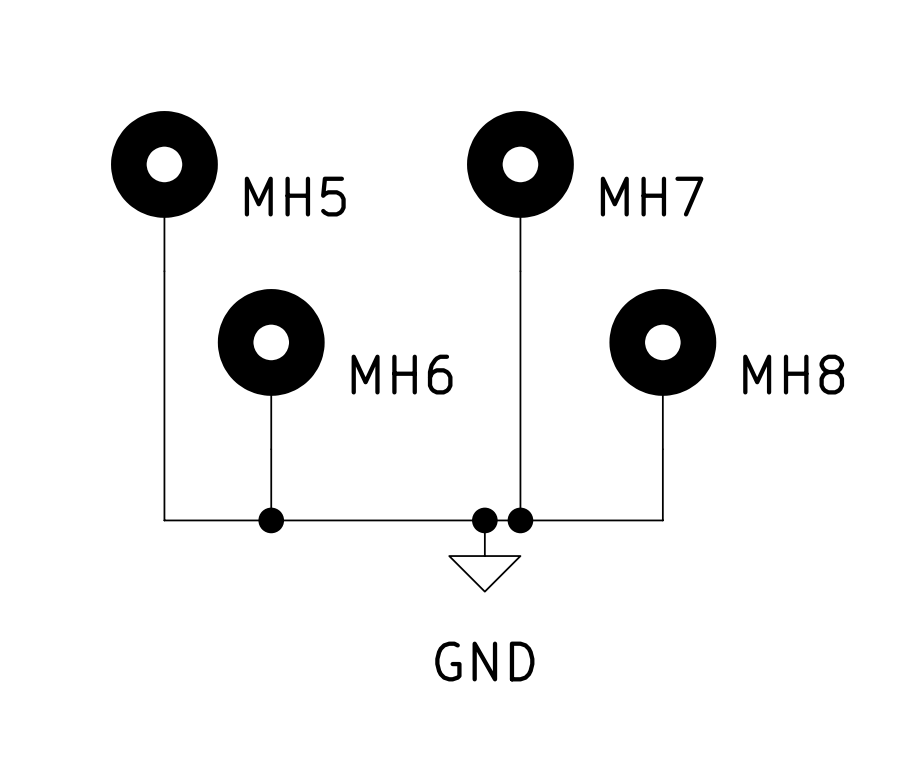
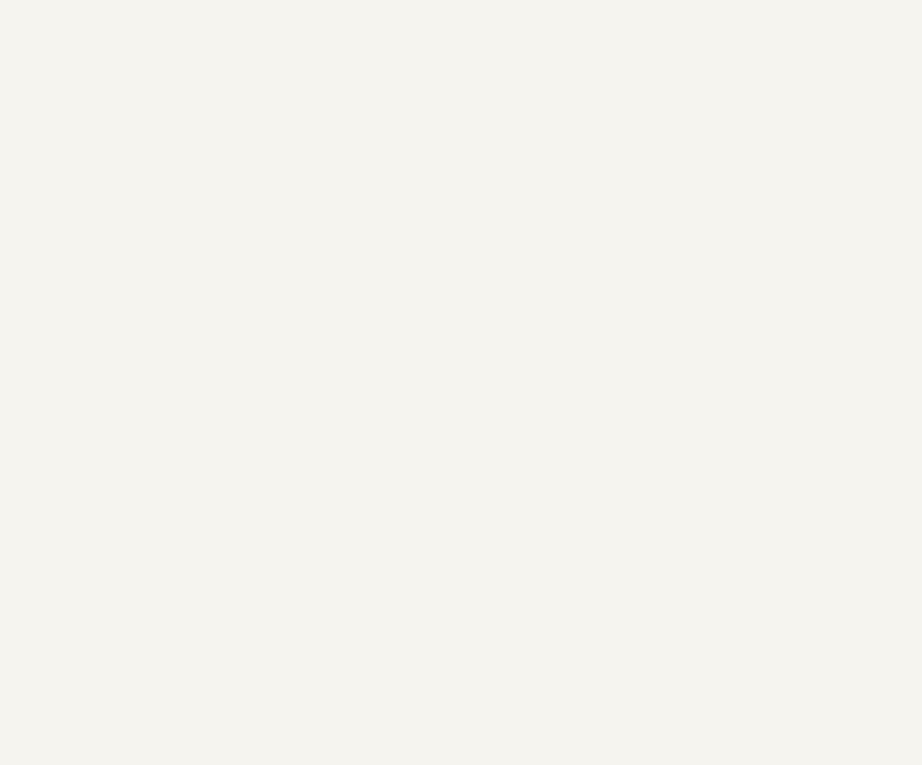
MH5: (164, 191) -> none
MH7: (520, 191) -> none
wire: (164, 271) (164, 520) (662, 520) (662, 449) -> none
wire: (520, 271) (520, 520) -> none
MH6: (271, 369) -> none
MH8: (662, 369) -> none
wire: (271, 449) (271, 520) -> none
junction: (271, 520) -> none
junction: (484, 520) -> none
junction: (520, 520) -> none
power symbol: GND (484, 556) -> none

